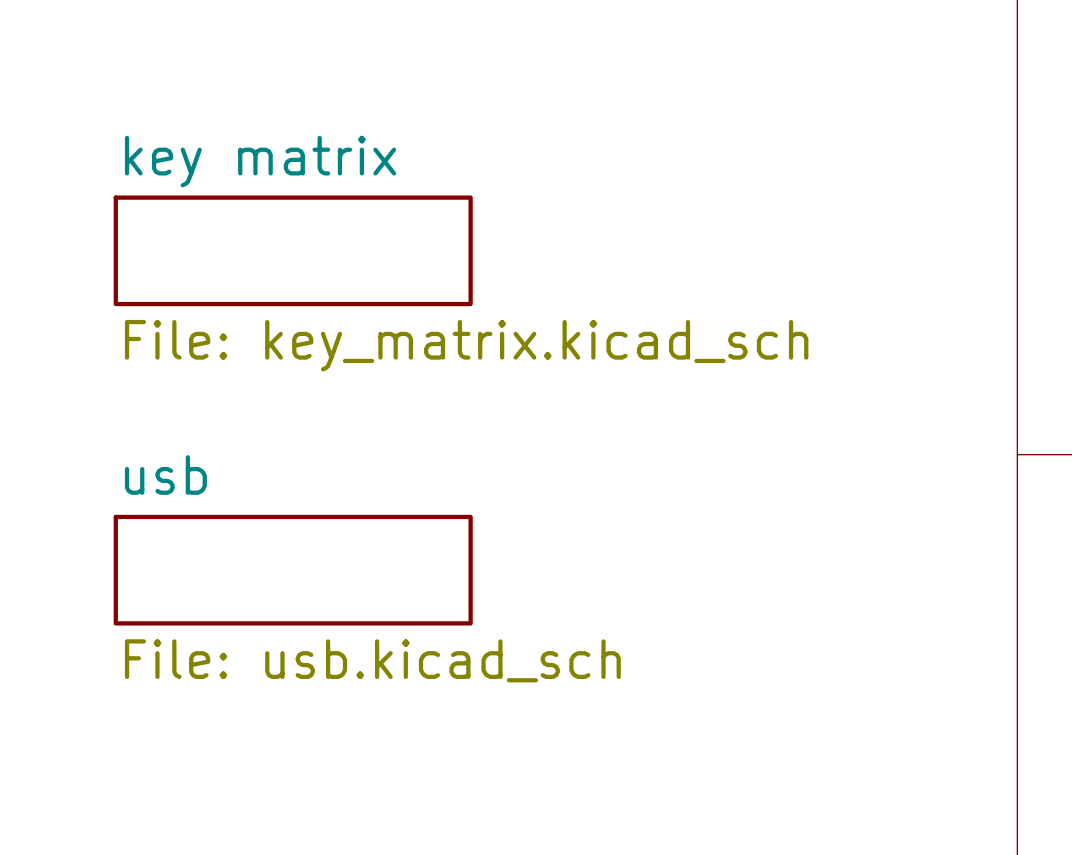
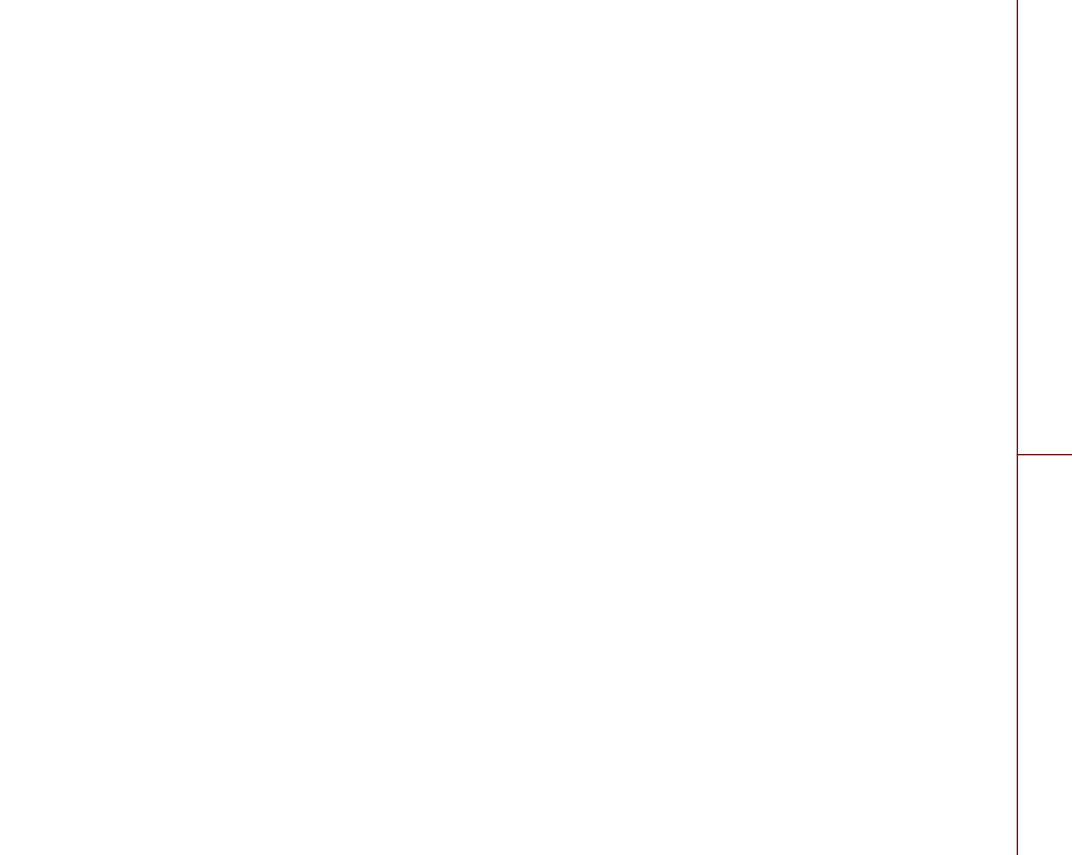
sheet key matrix: File: key_matrix.kicad_sch (293, 250) -> none
sheet usb: File: usb.kicad_sch (293, 570) -> none

